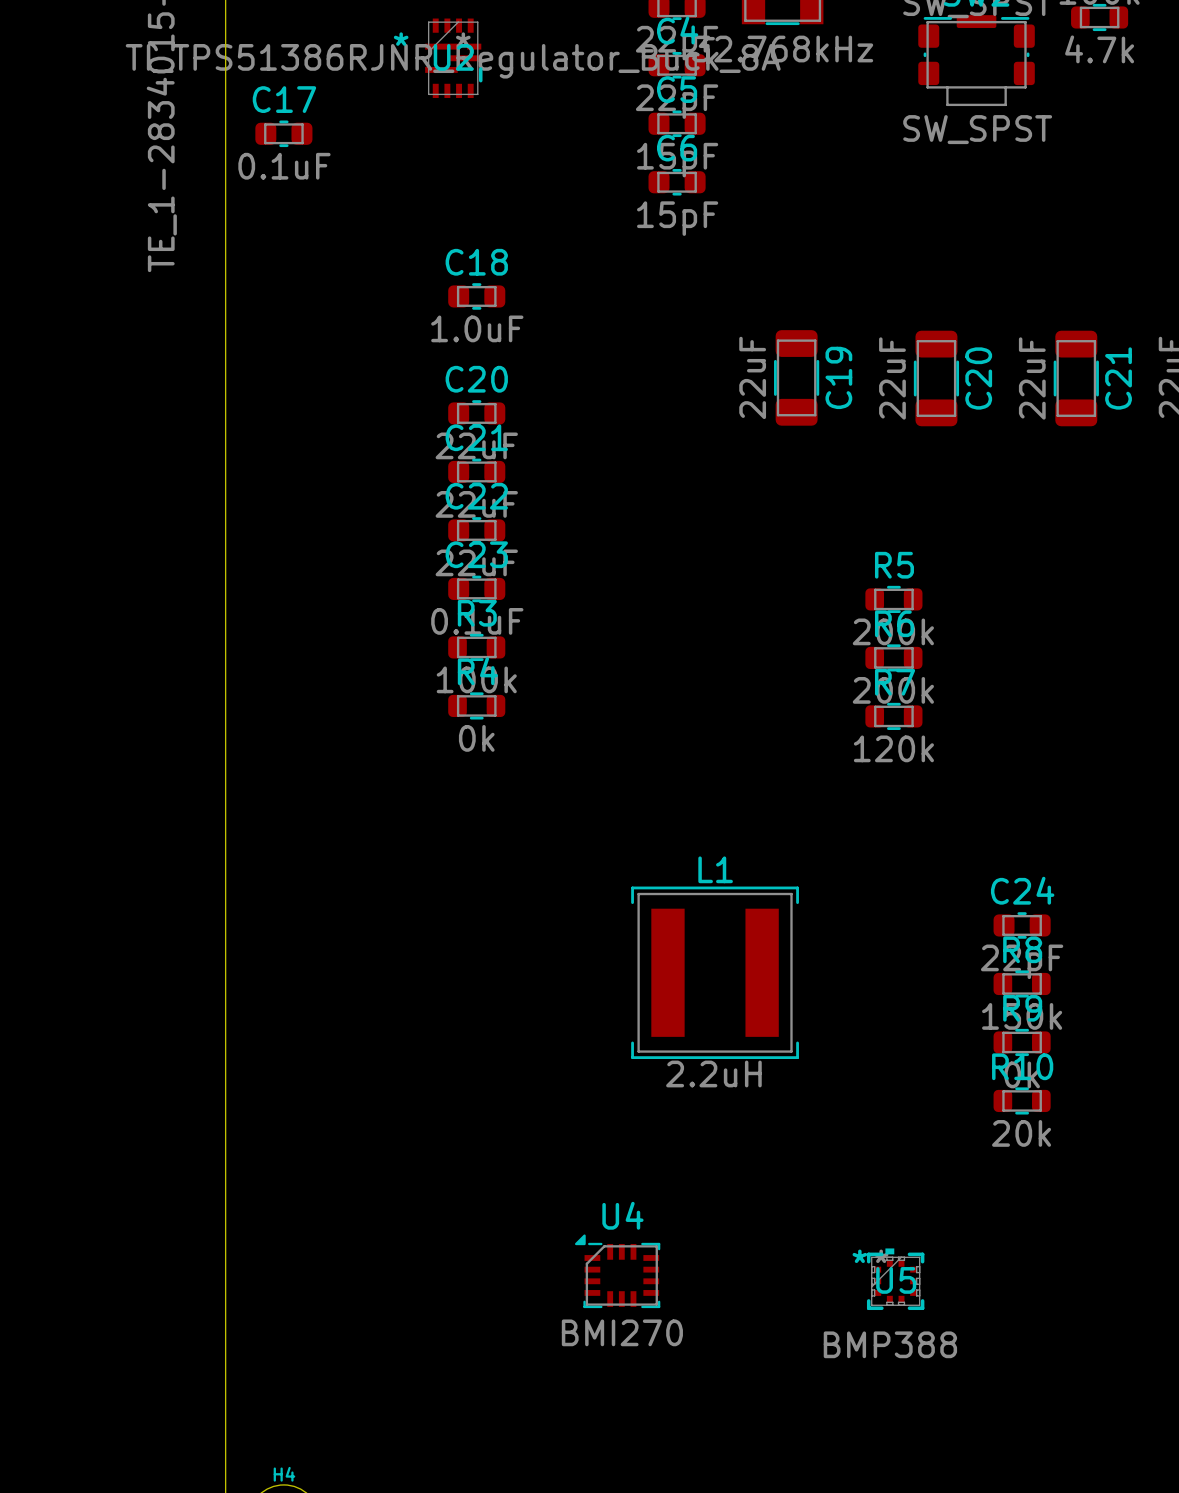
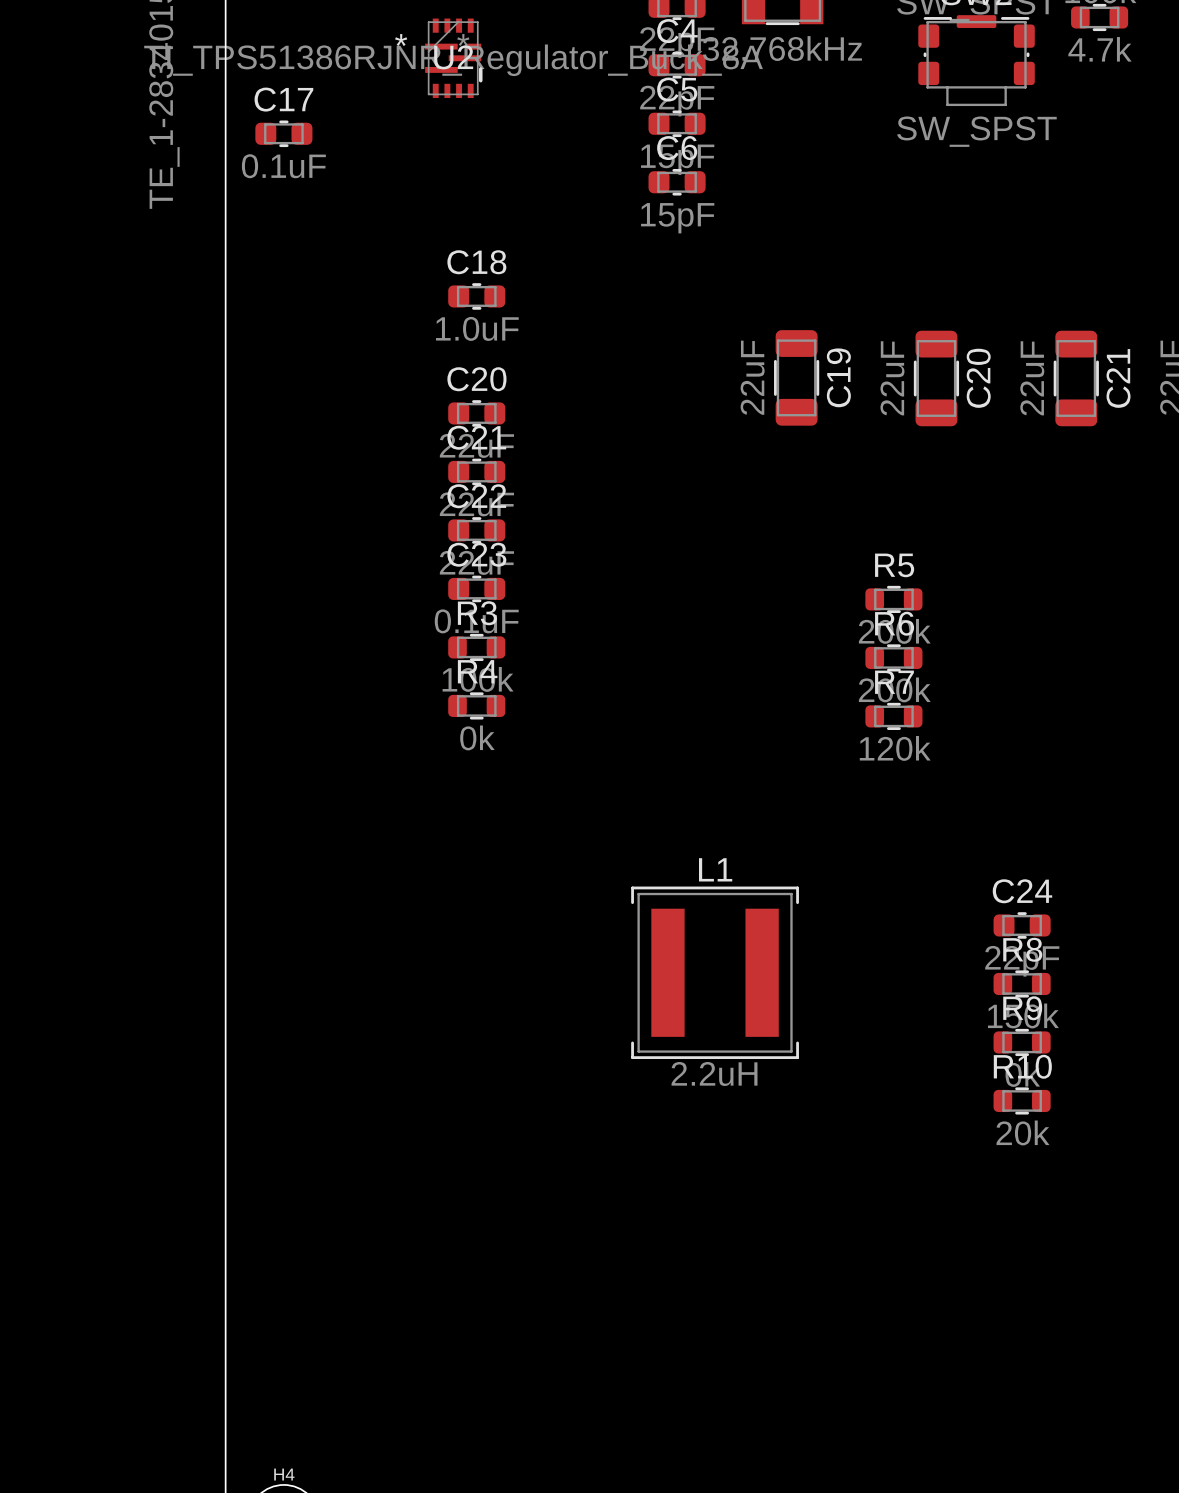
U4: BMI270 (617, 1271) -> none
U5: BMP388 (895, 1279) -> none

